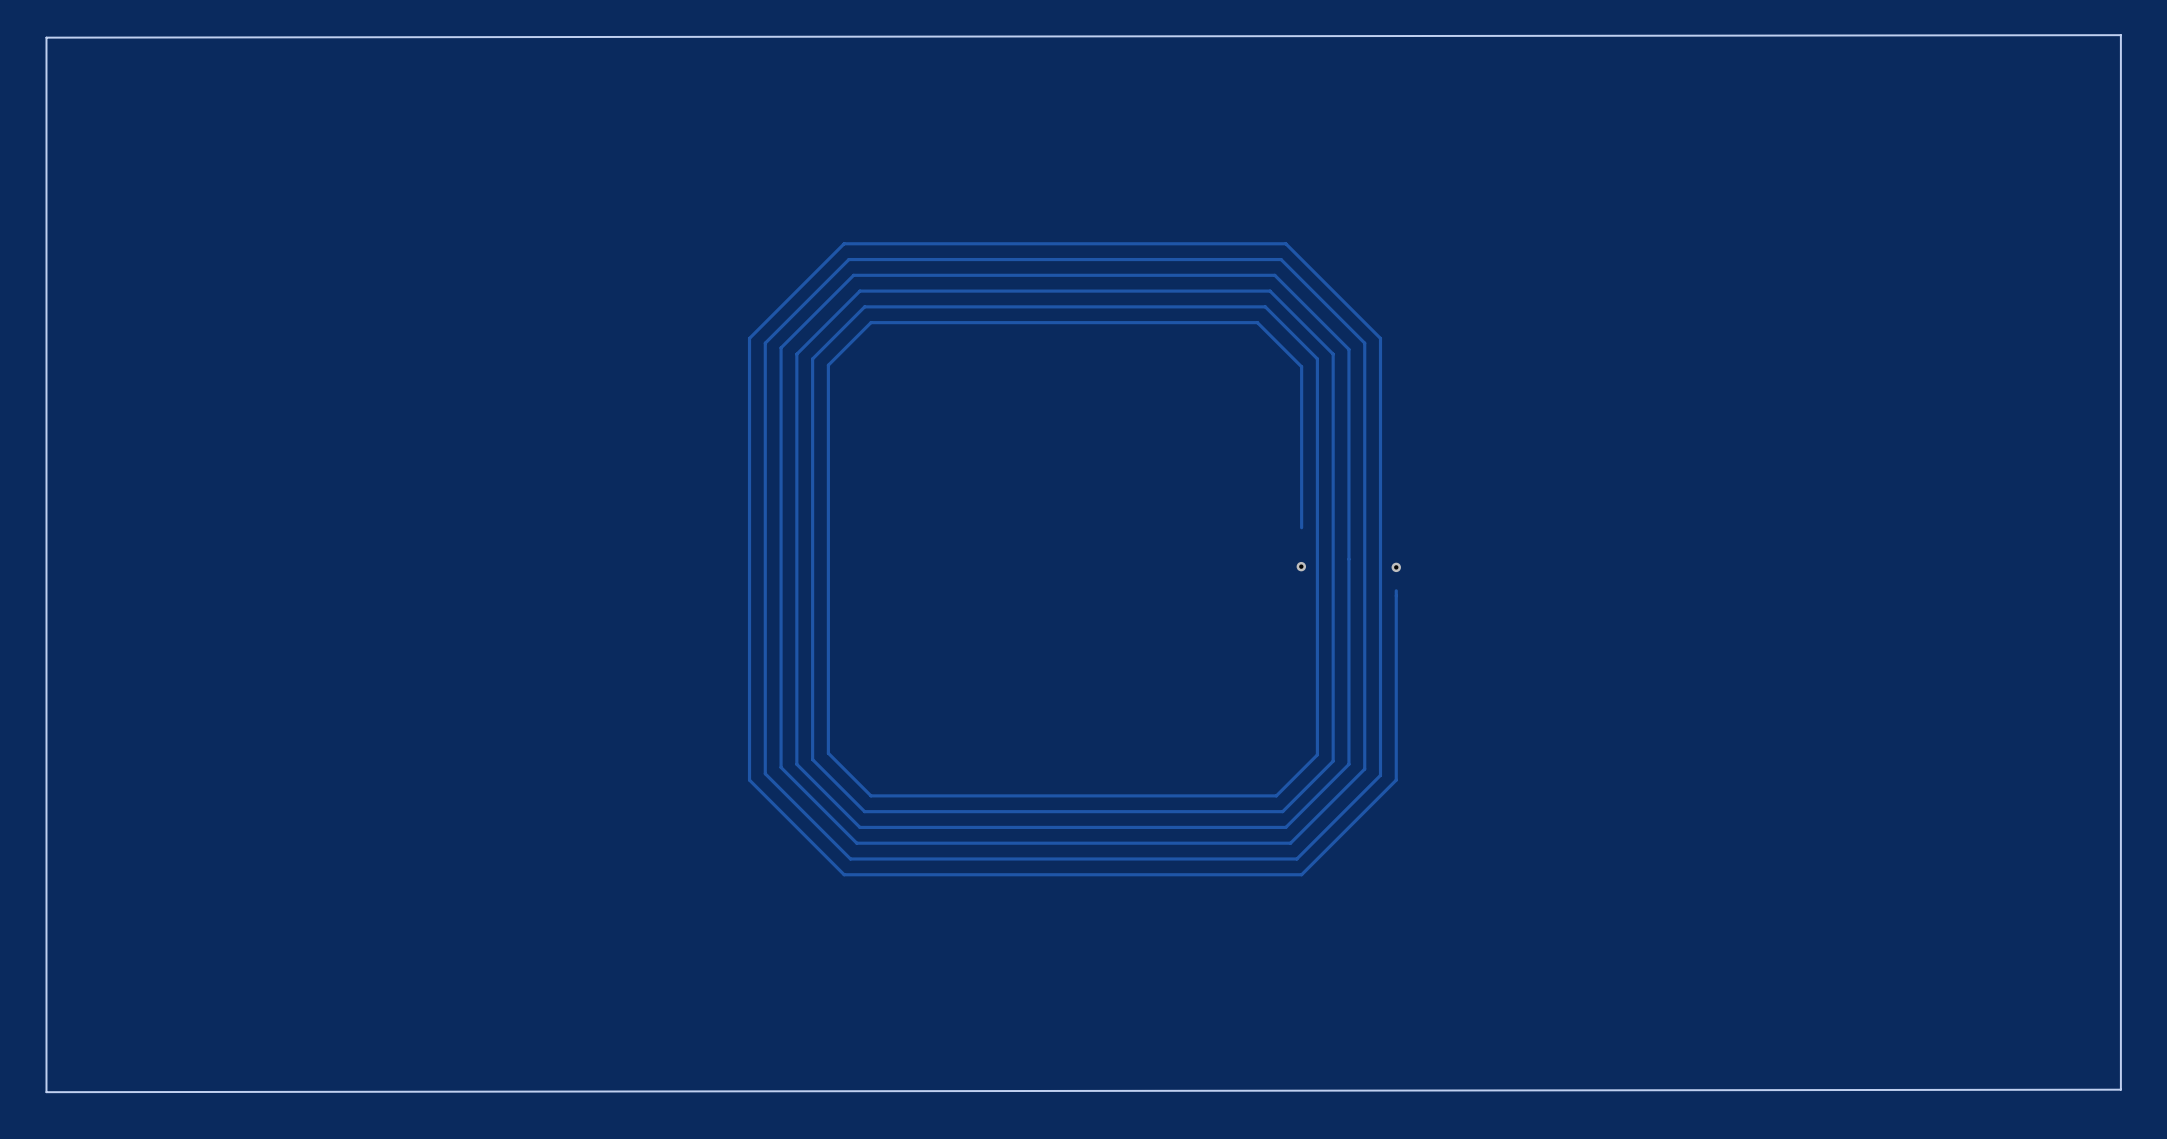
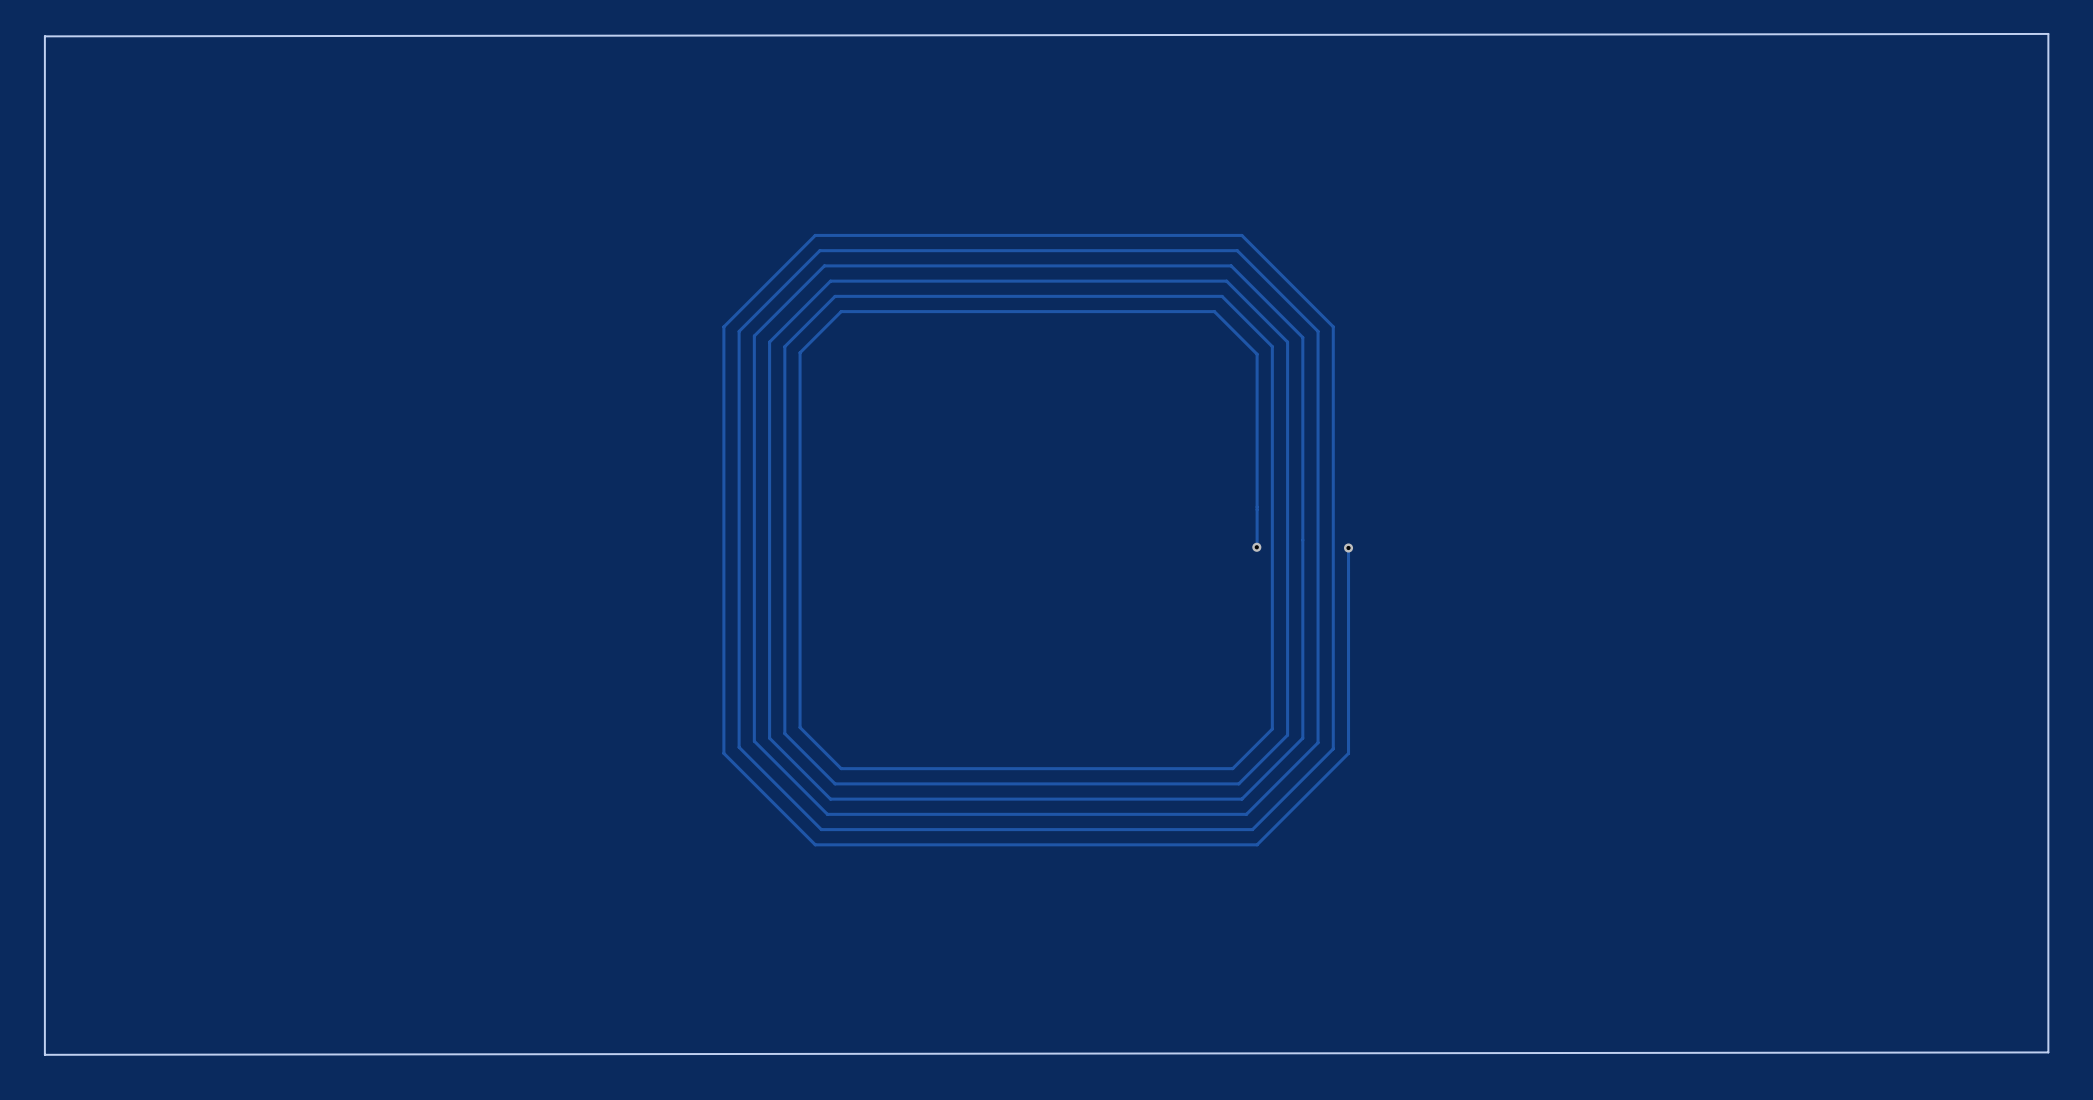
track: none -> (1257, 509) (1256, 547)
track: none -> (1348, 547) (1348, 570)

